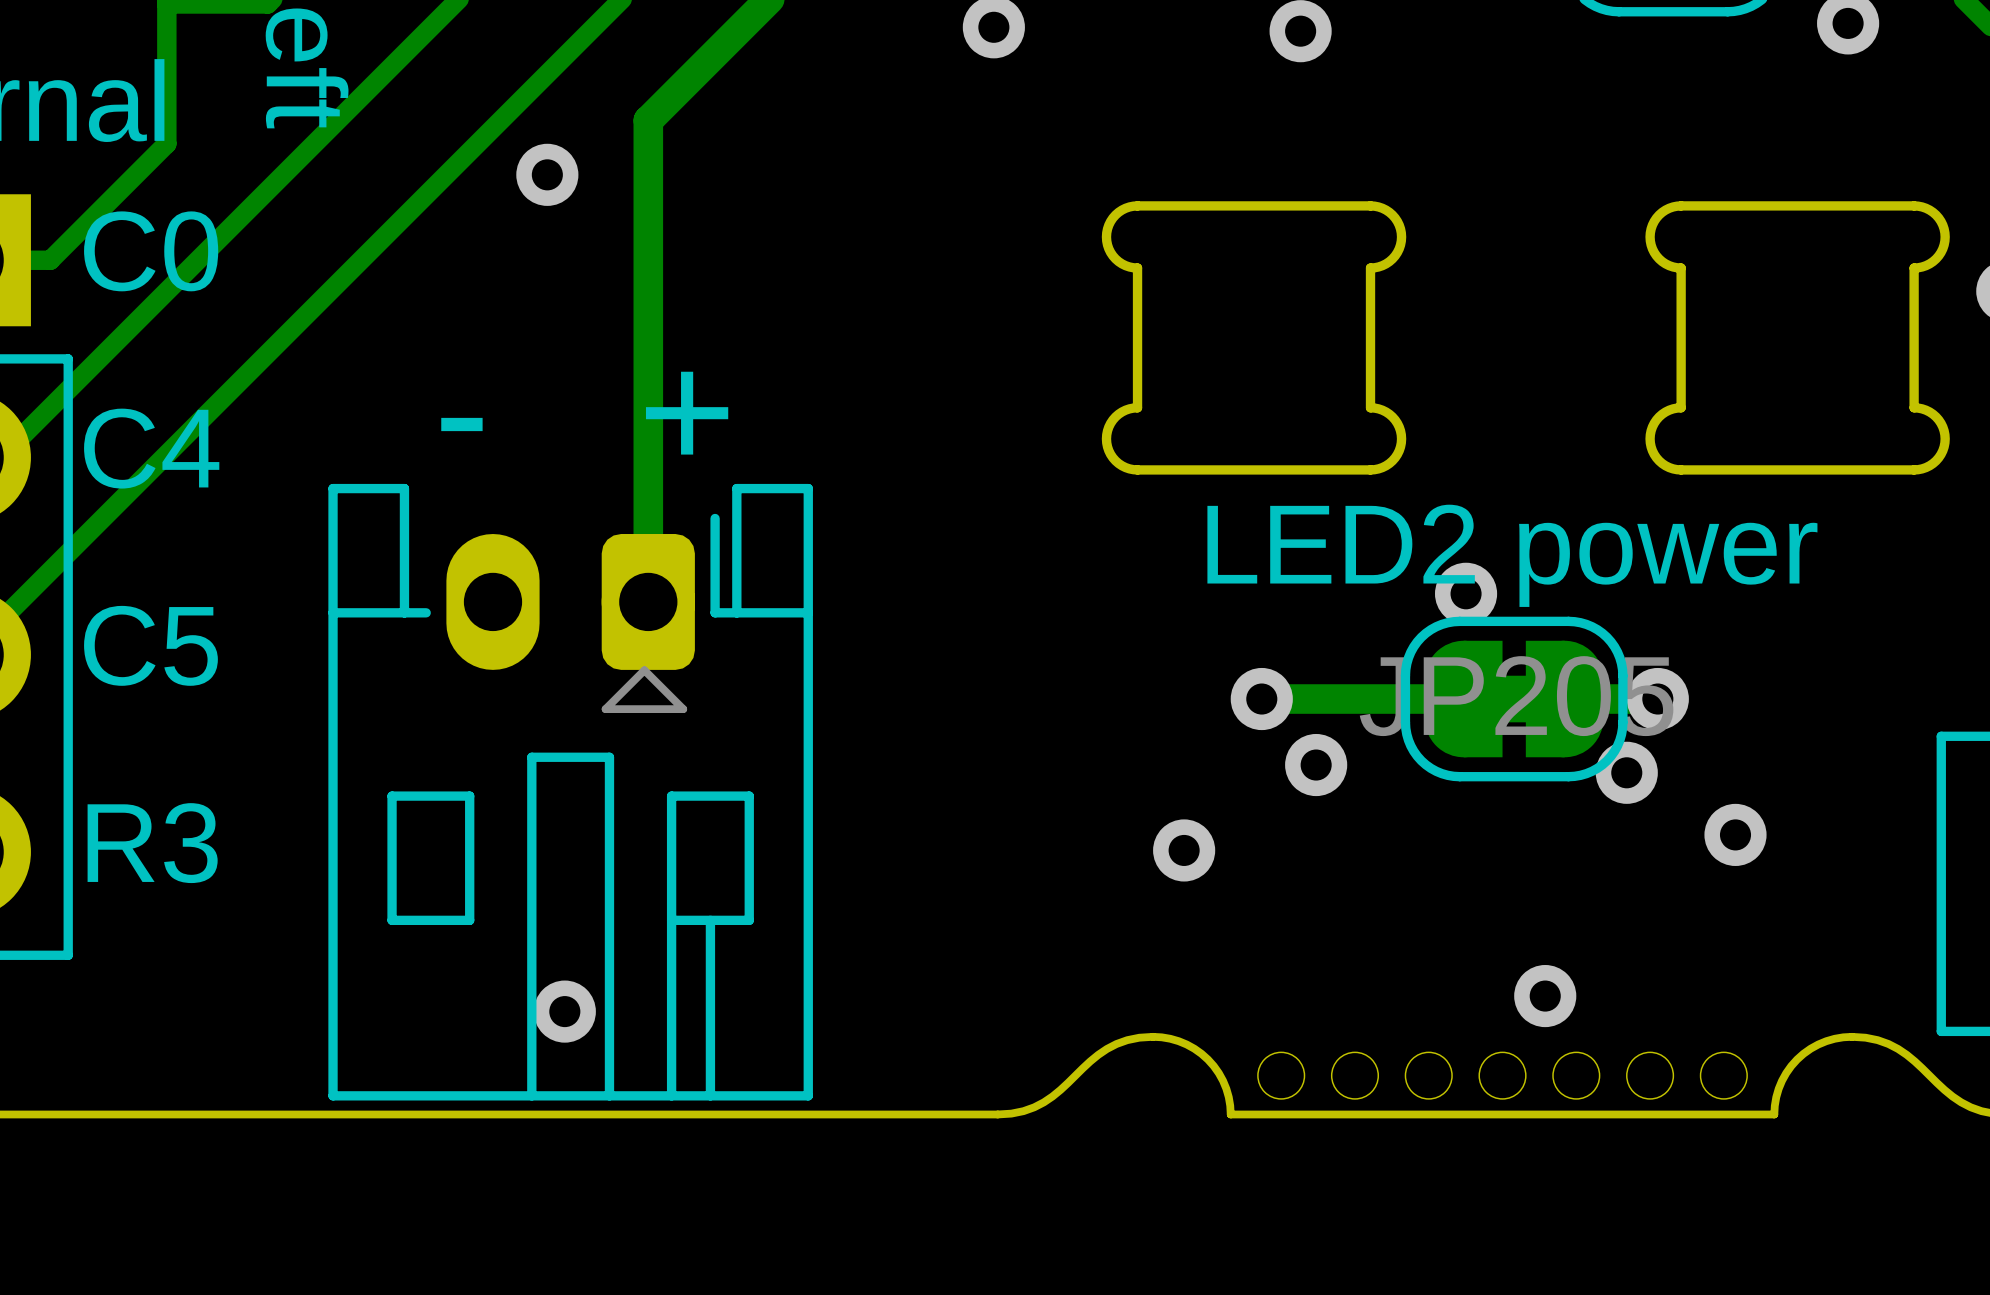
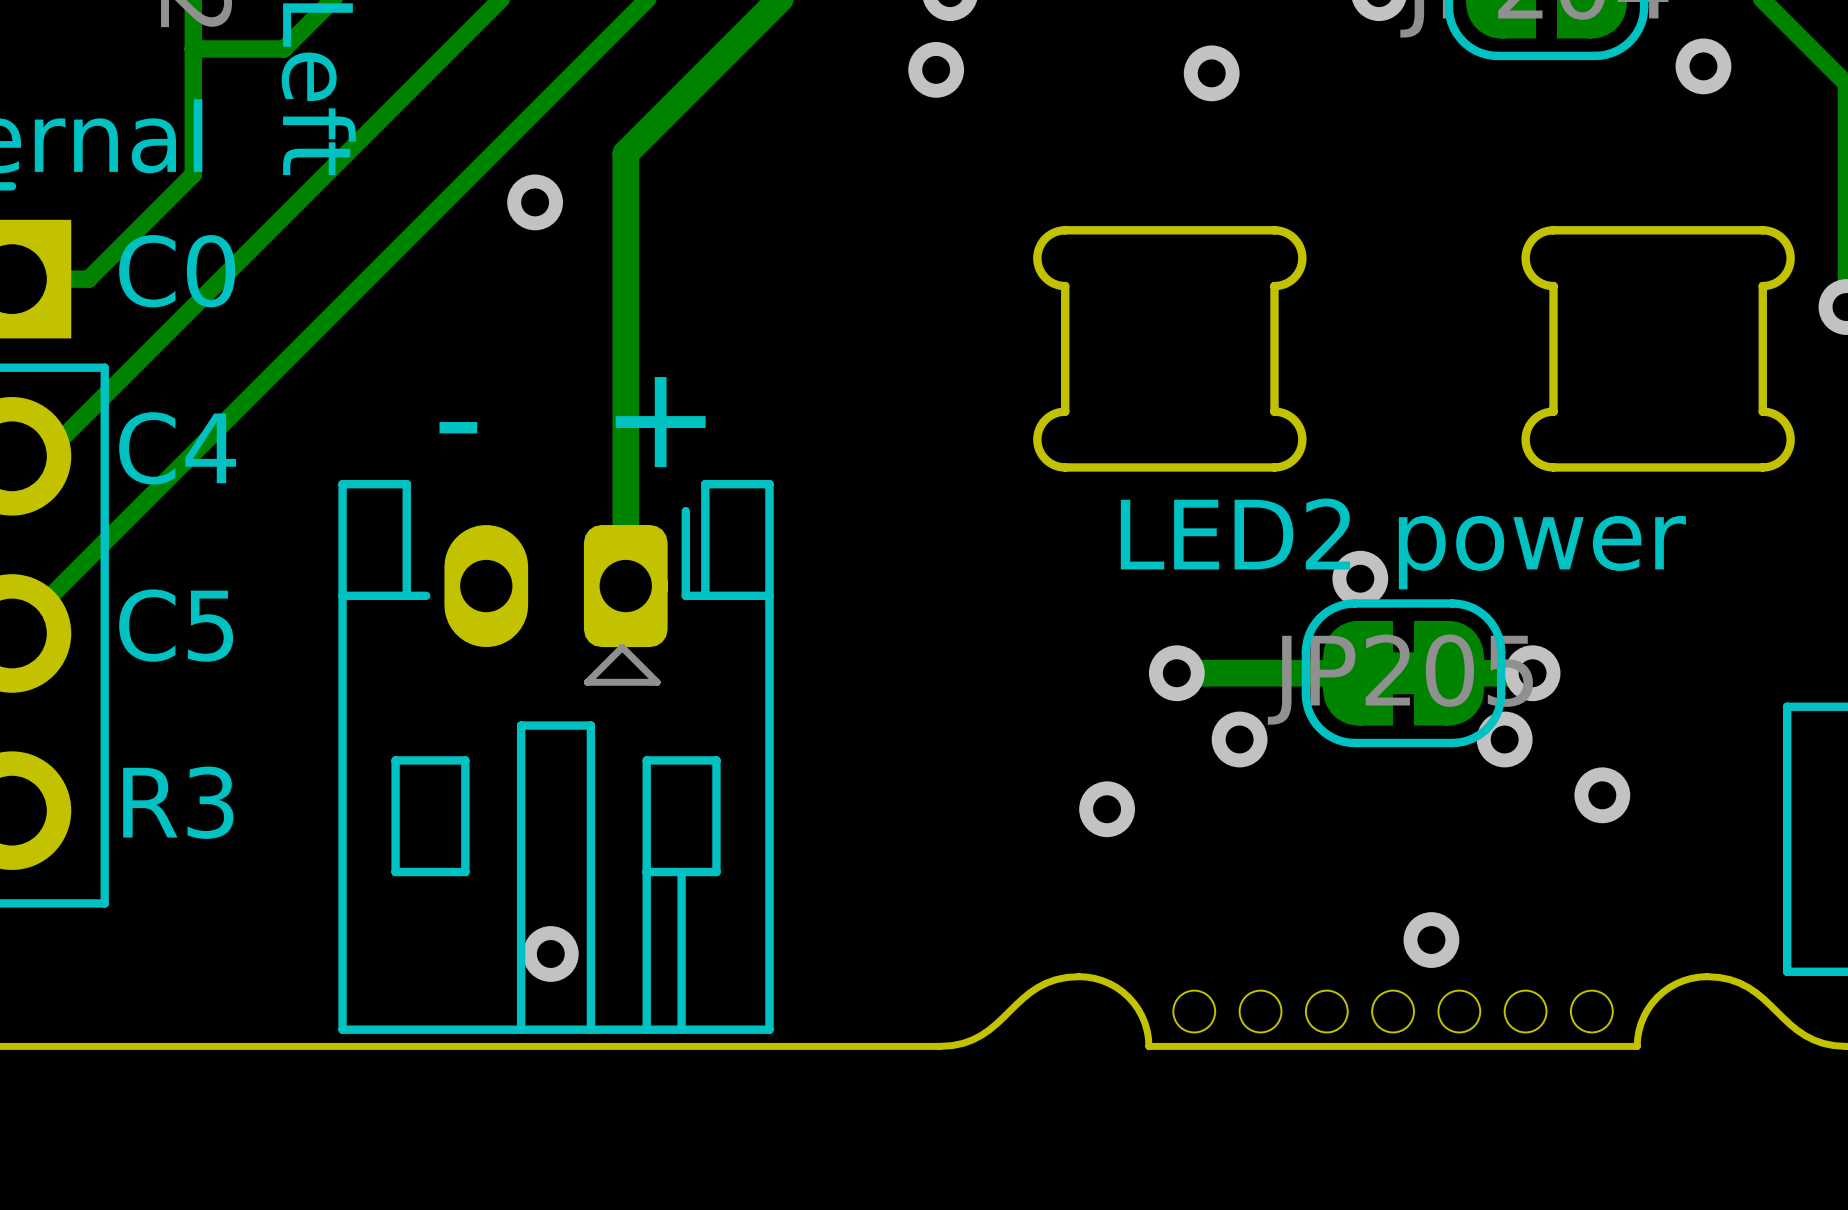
via position: (1316, 765) -> (1239, 739)

